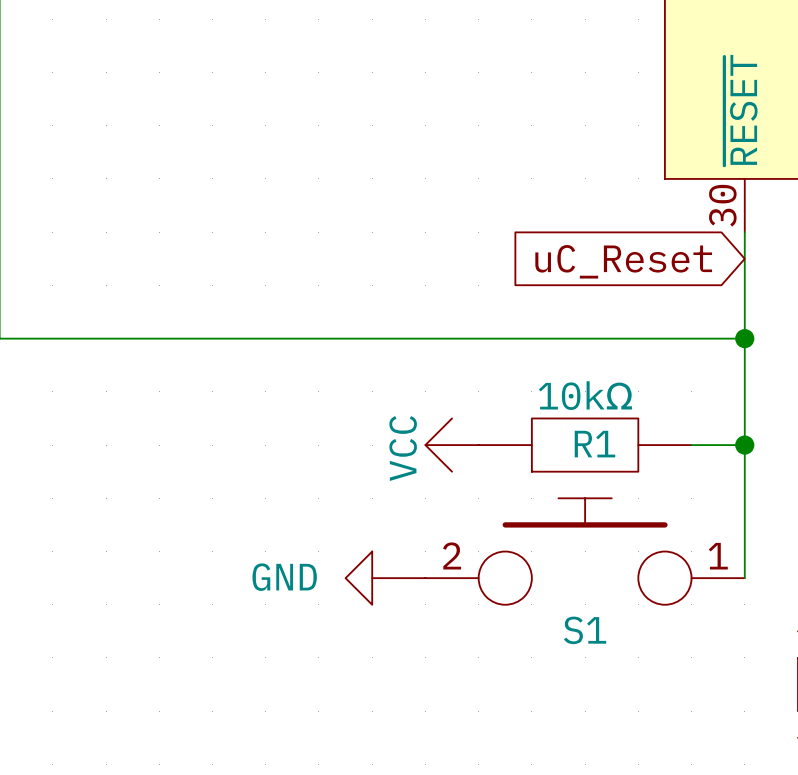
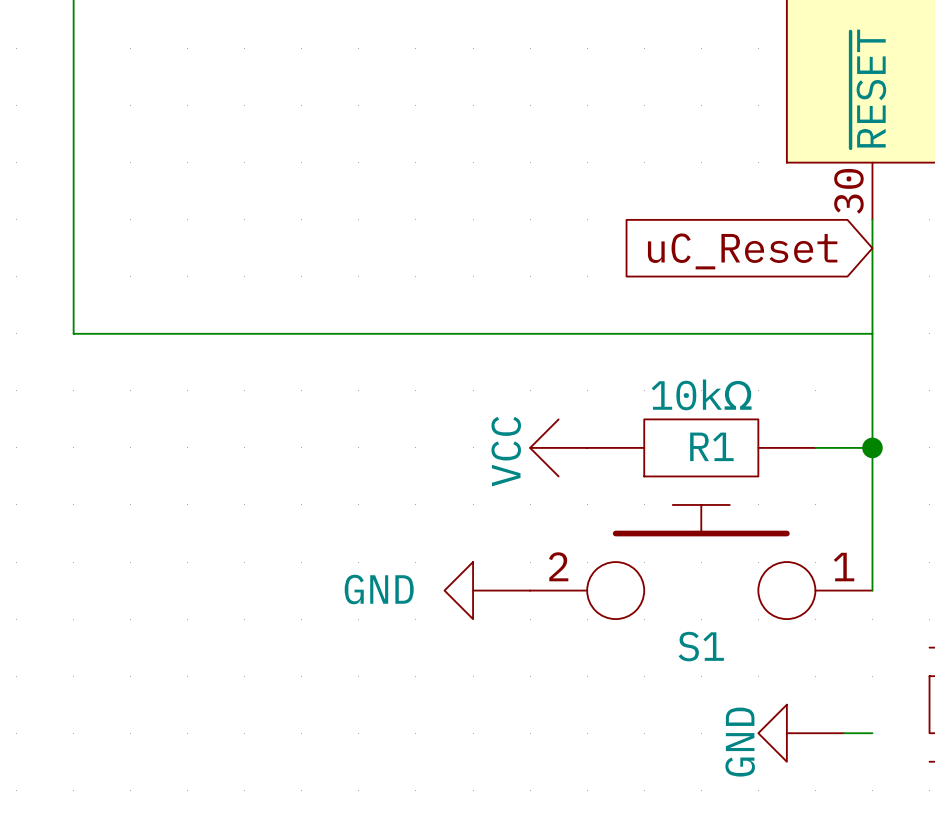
junction: (744, 338) -> none
power symbol: none -> GND (801, 733)
wire: none -> (843, 733) (872, 733)

